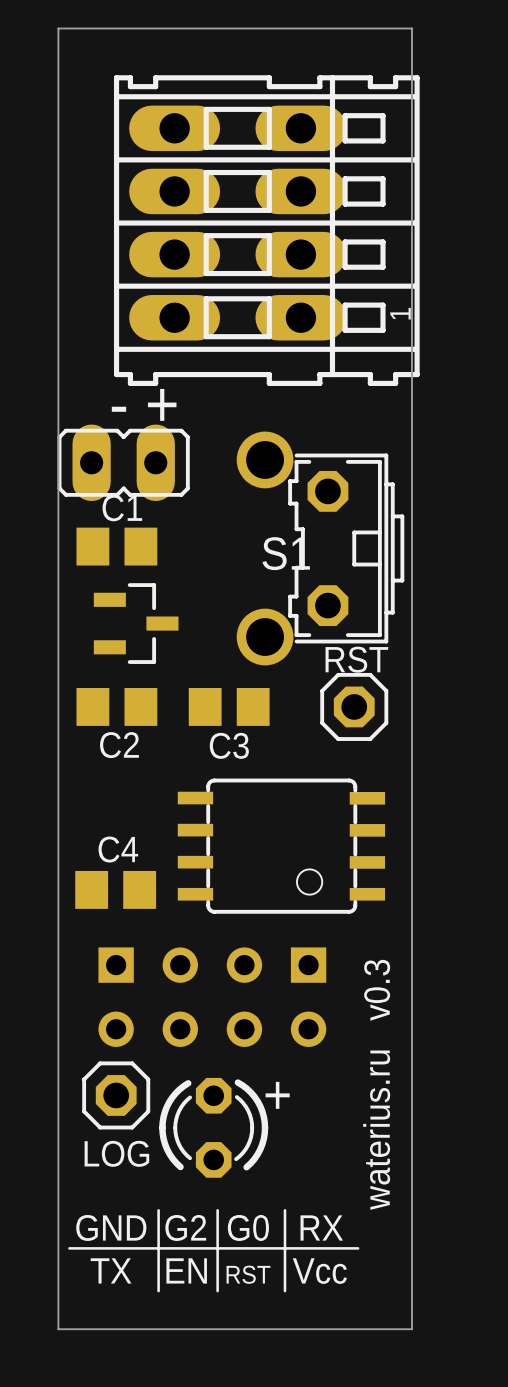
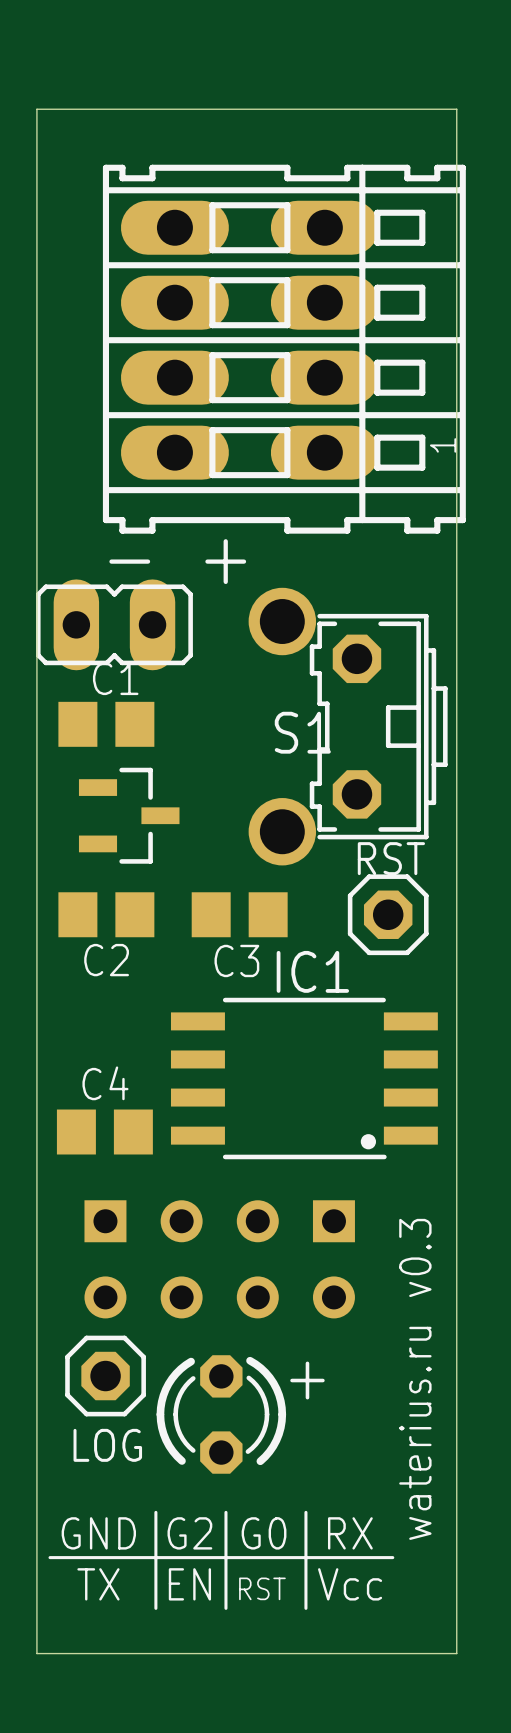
IC1: none -> (304, 1078)
part: (281, 846) -> none

